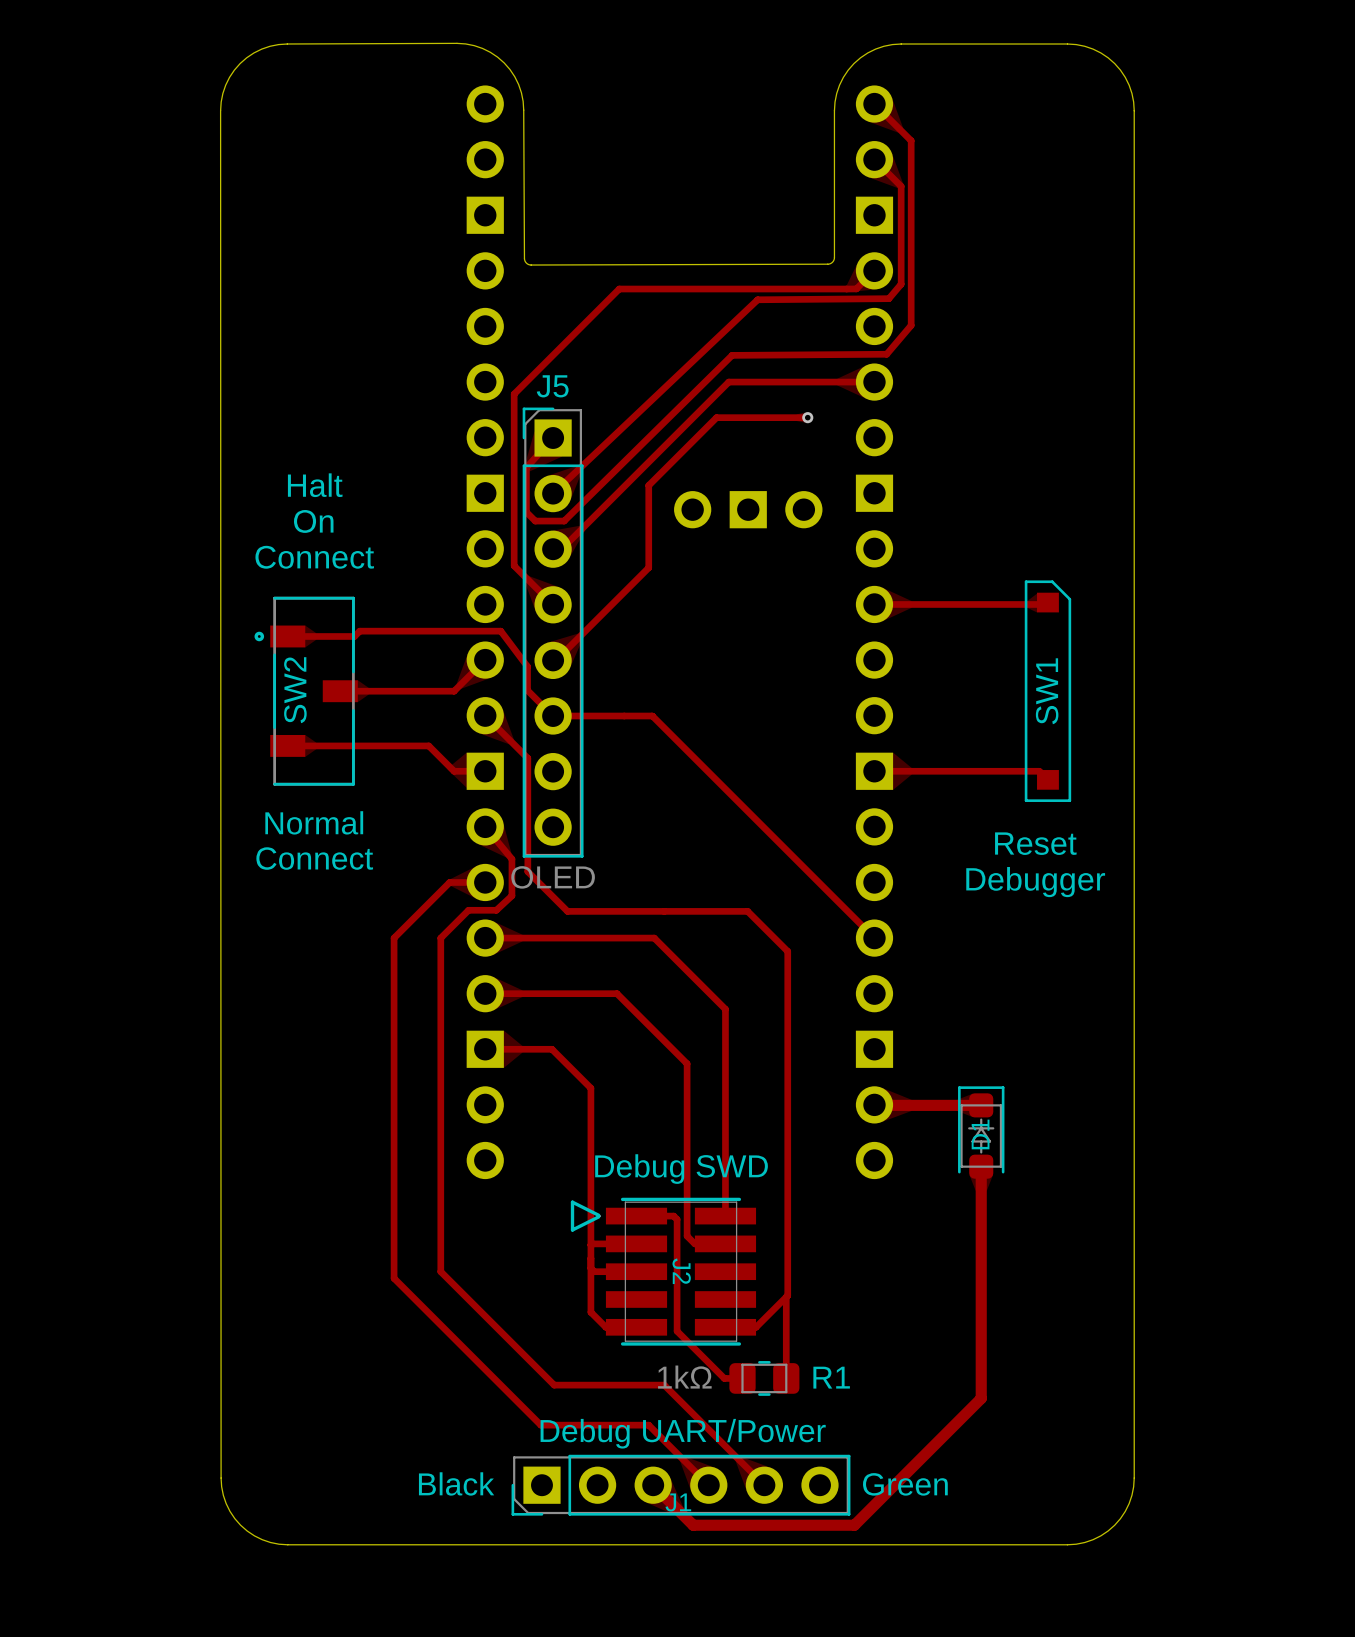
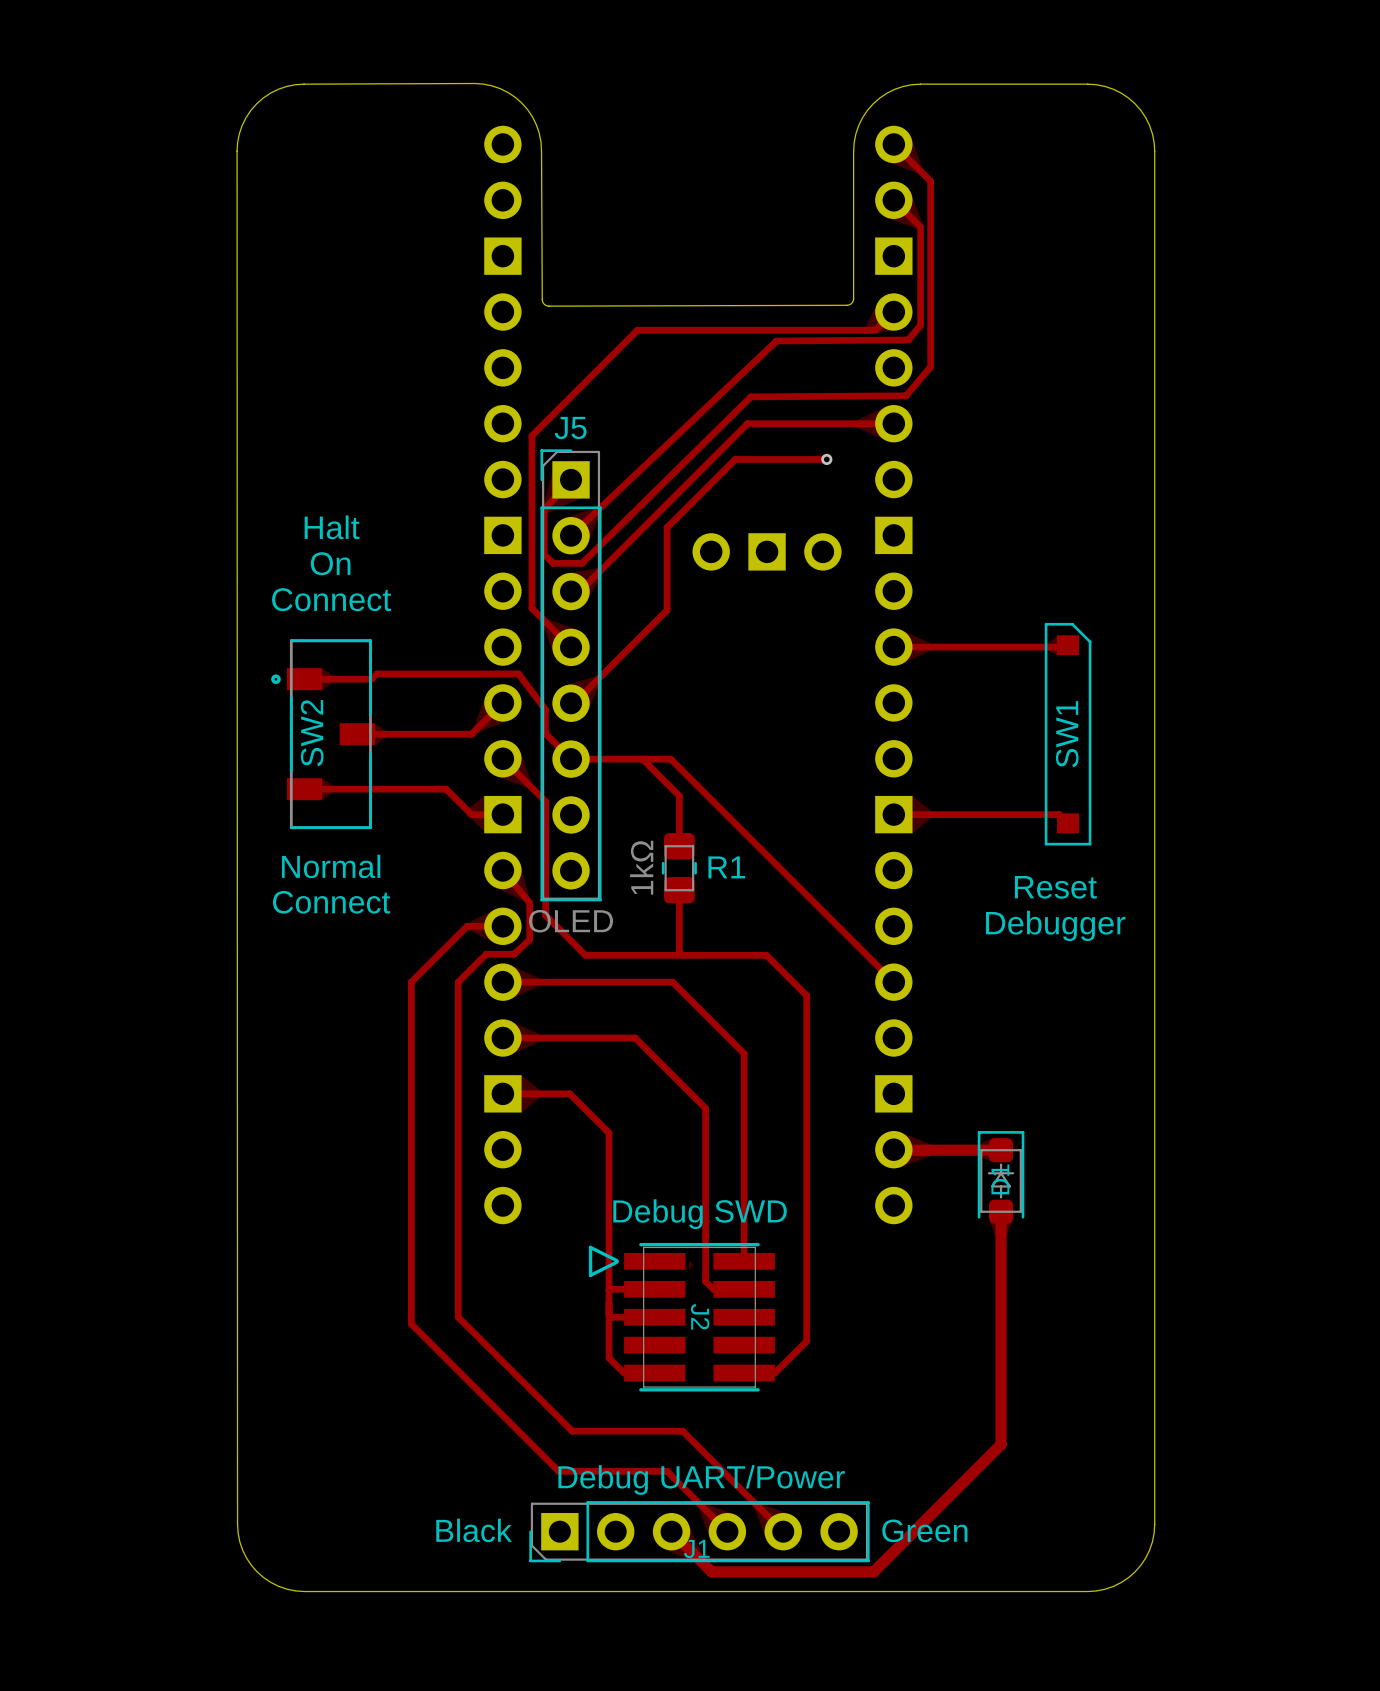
track: none -> (642, 759) (679, 795) (679, 846)
track: none -> (679, 890) (679, 952) (682, 955)
track: (636, 1216) (673, 1216) (677, 1219) (677, 1331) (724, 1378) (742, 1378) -> none
track: (786, 1297) (786, 1378) -> none
R1 value position: 1kΩ (684, 1377) -> 1kΩ (641, 867)
R1 rotation: 0° (764, 1378) -> 90° clockwise (679, 868)
R1 position: (764, 1378) -> (679, 868)

